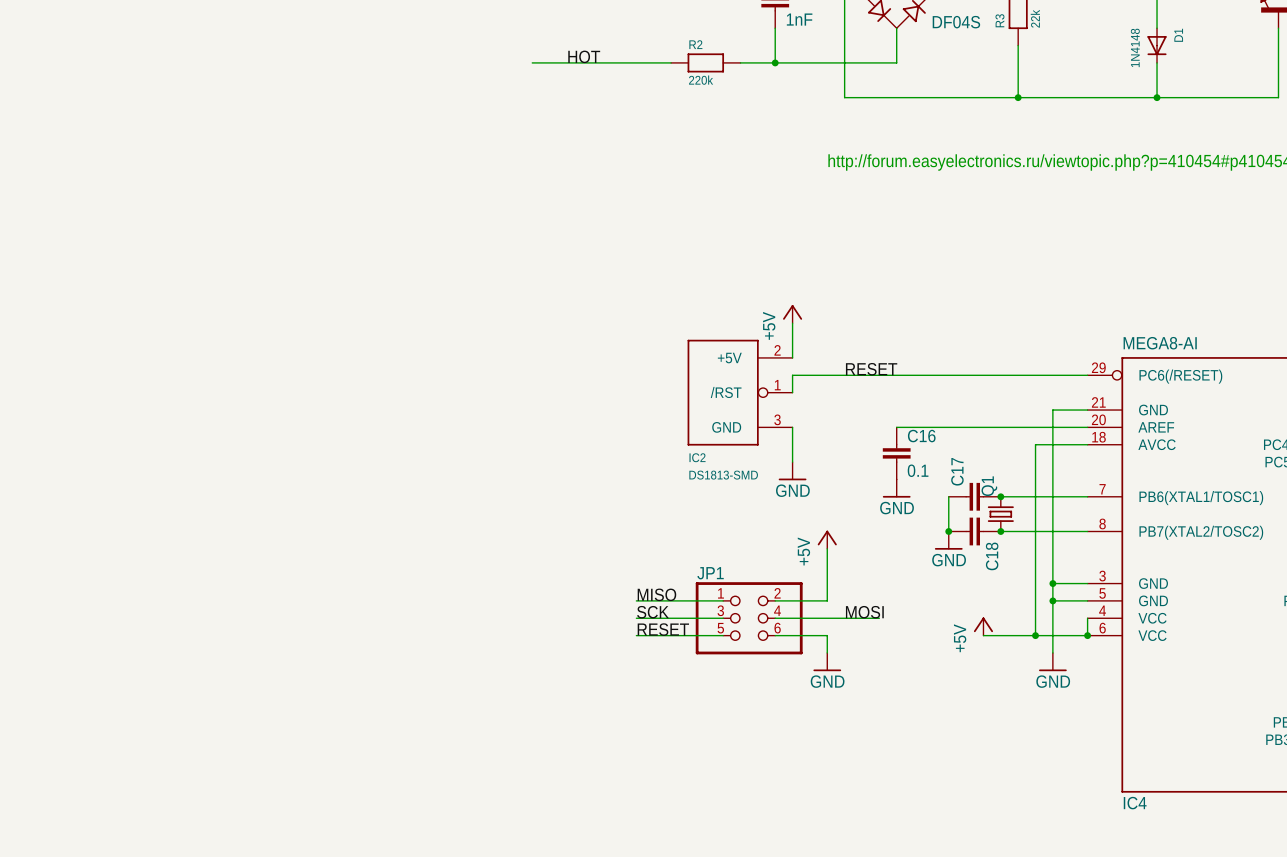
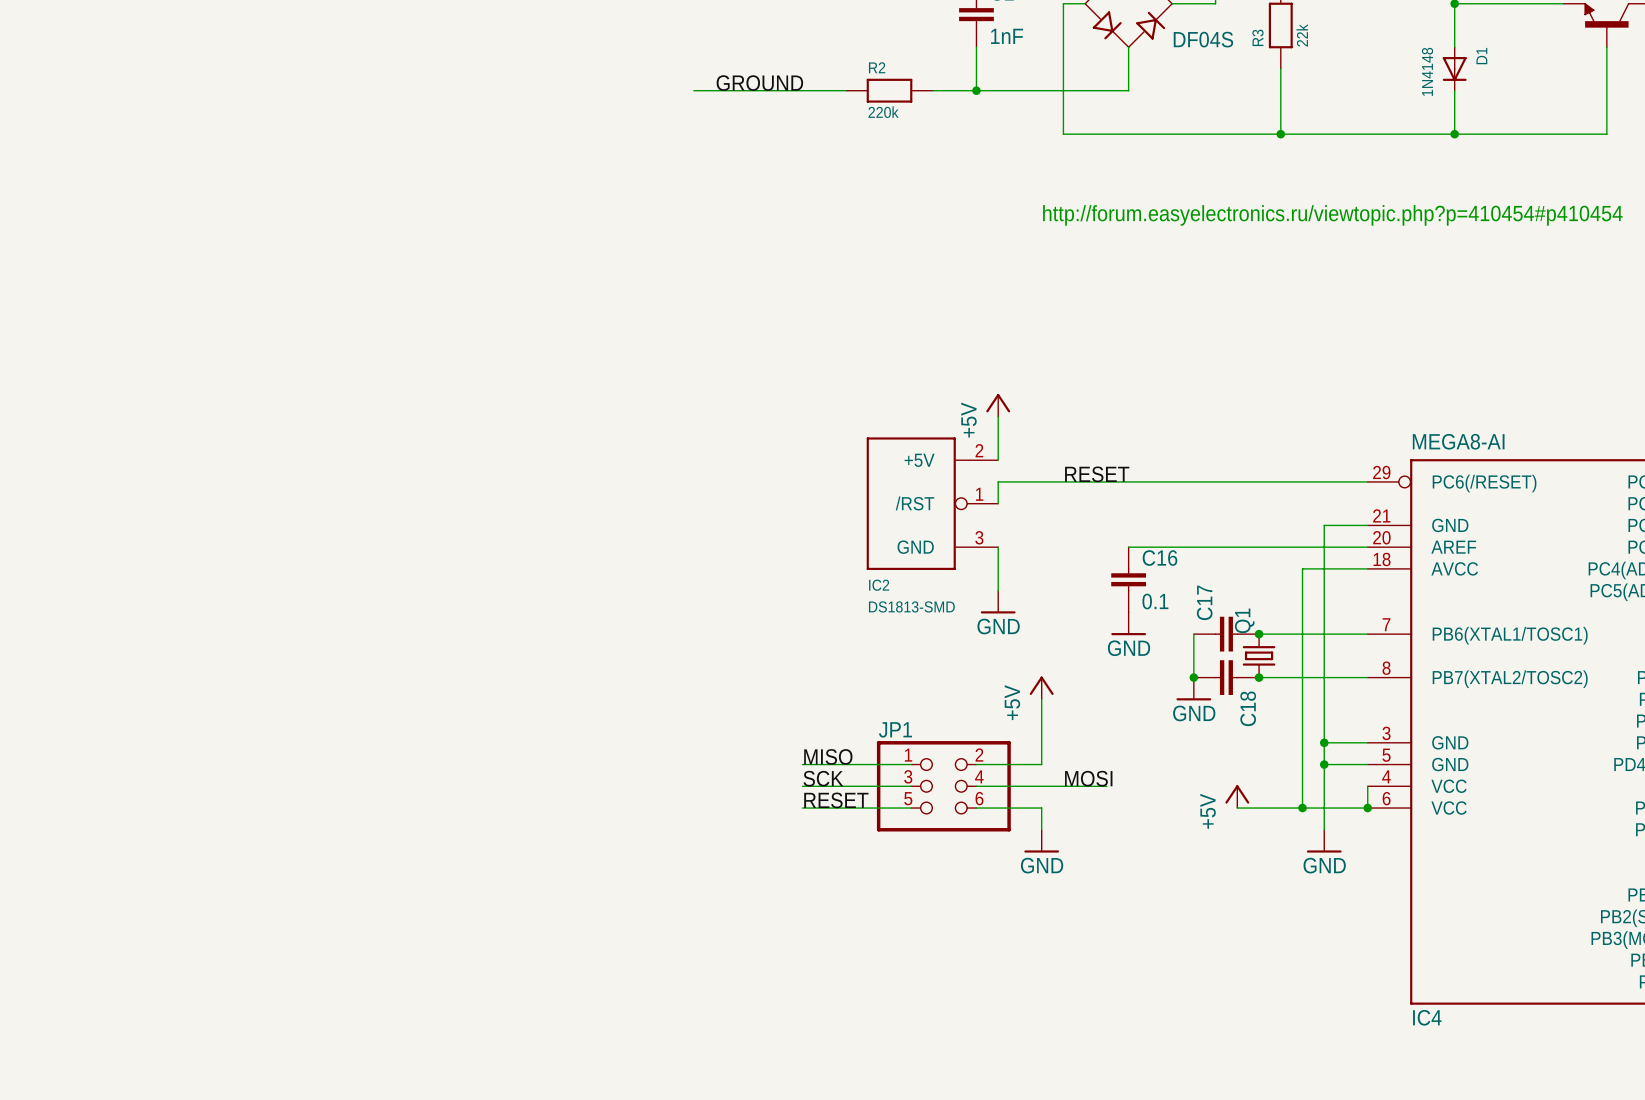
label: HOT (584, 56) -> GROUND (759, 83)
wire: (532, 62) (549, 62) -> none

